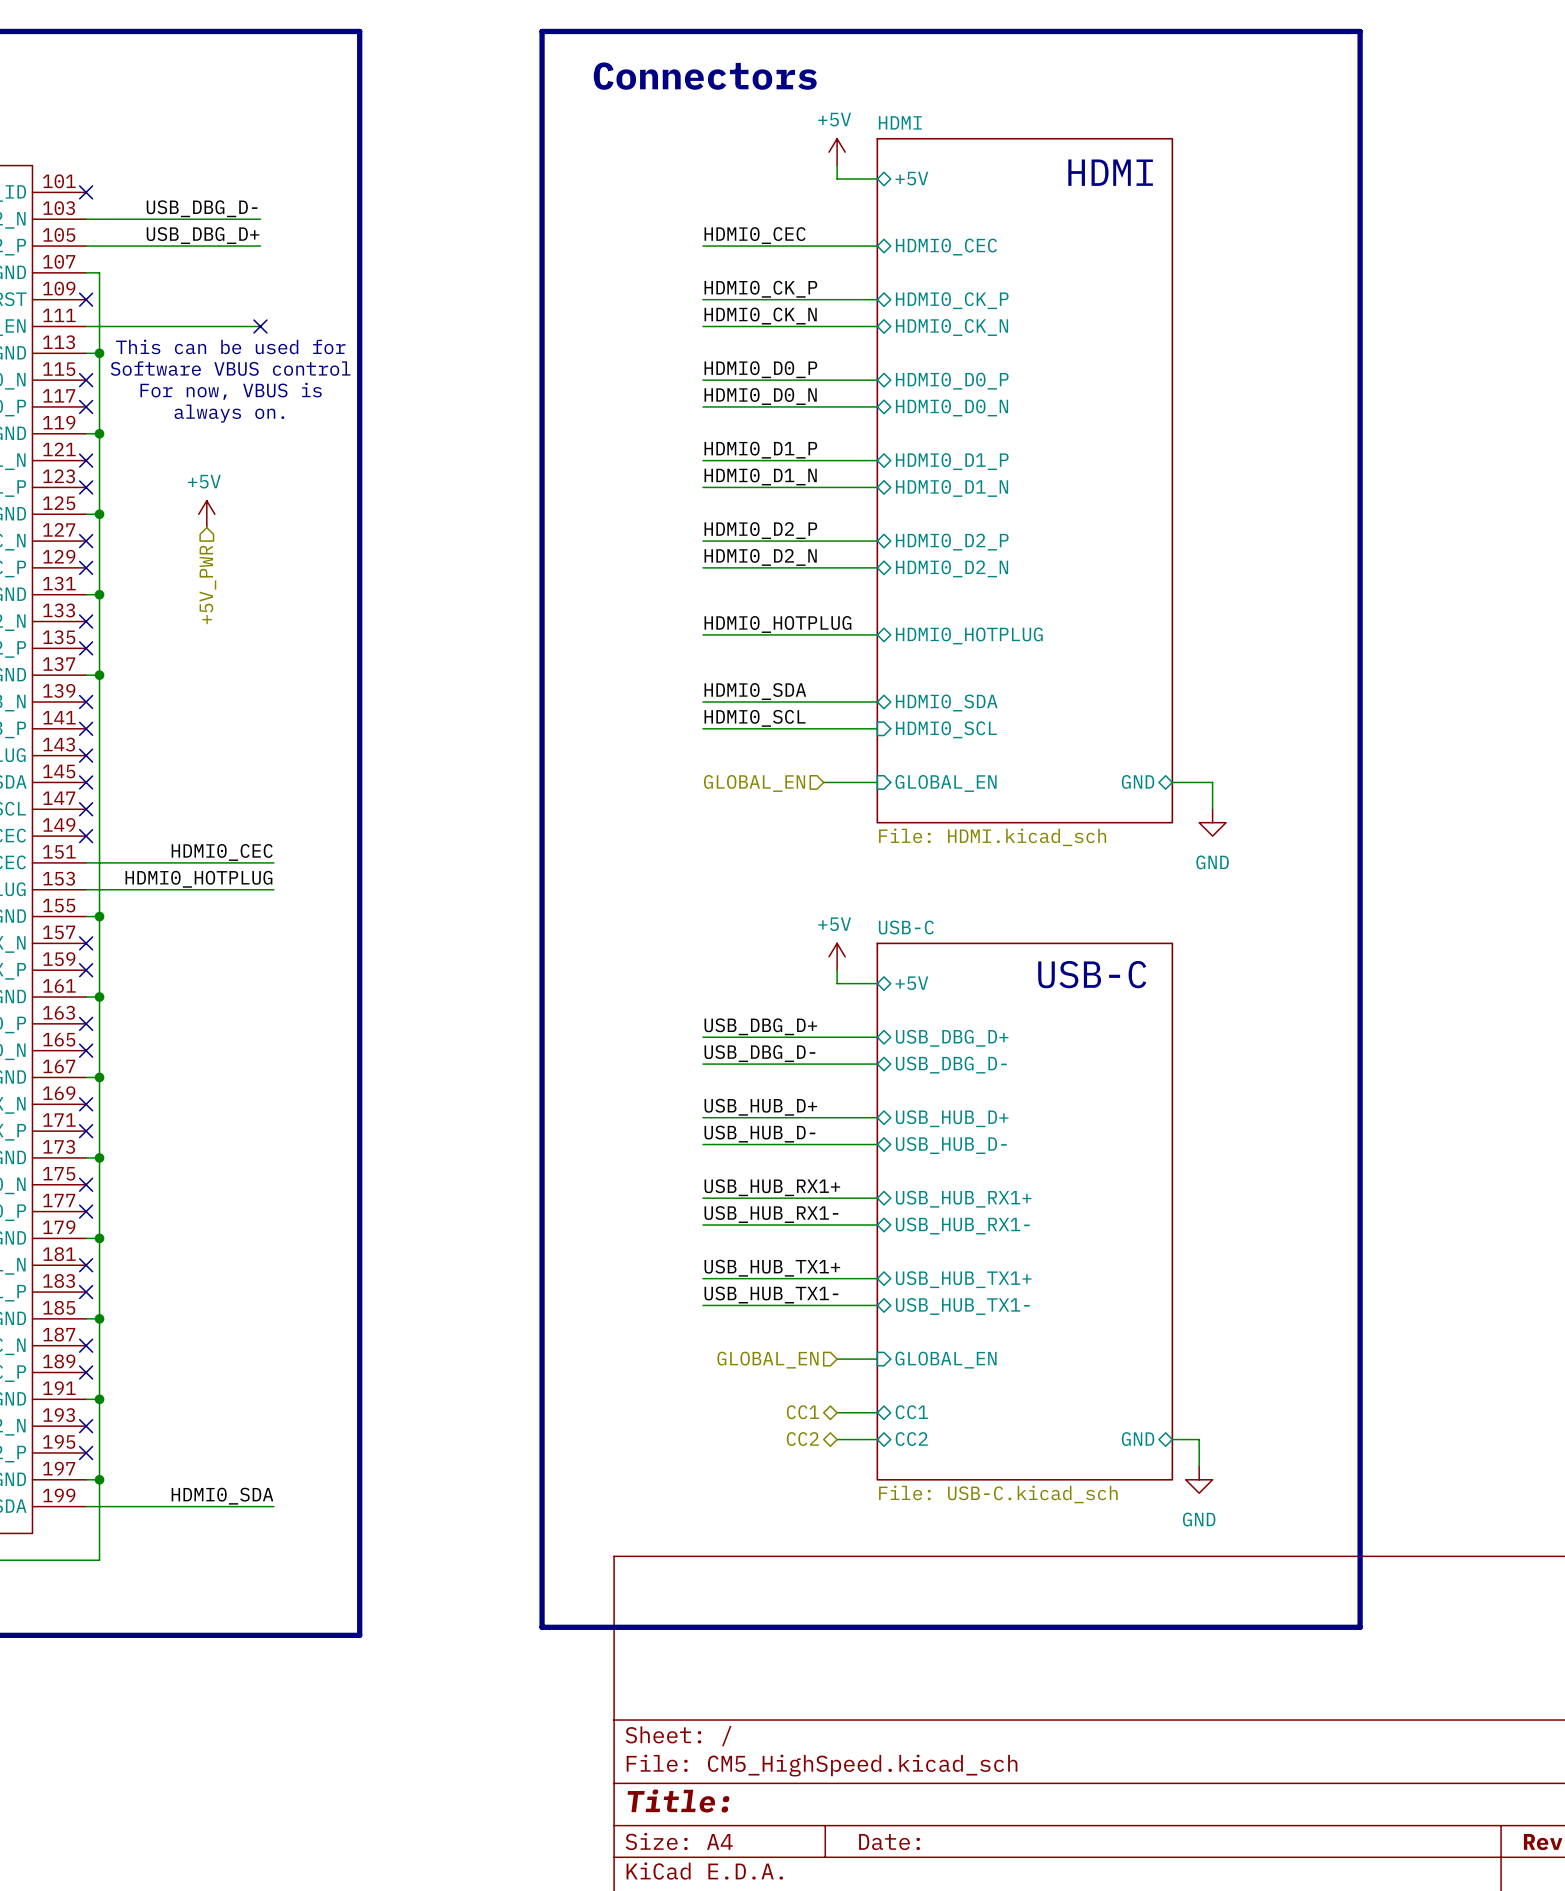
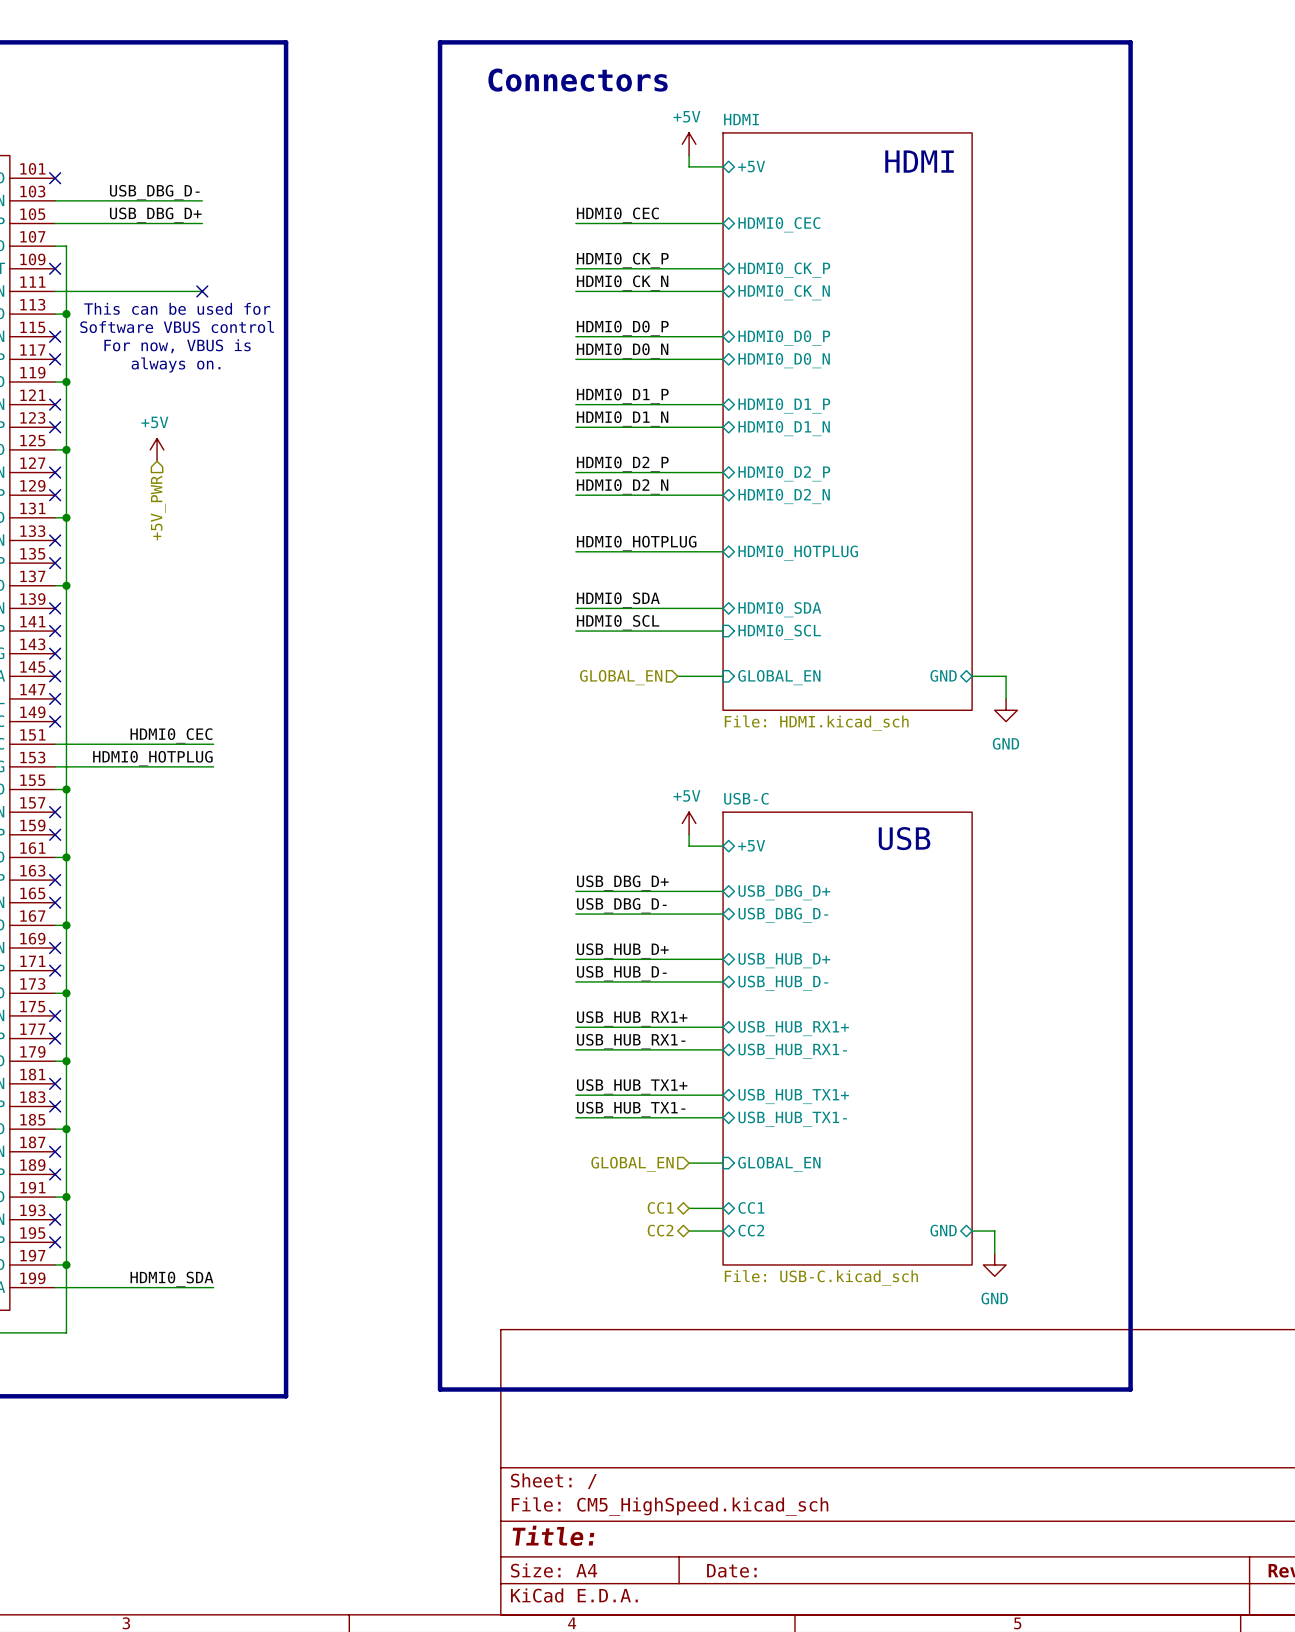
text: USB-C (1092, 974) -> USB (904, 838)

